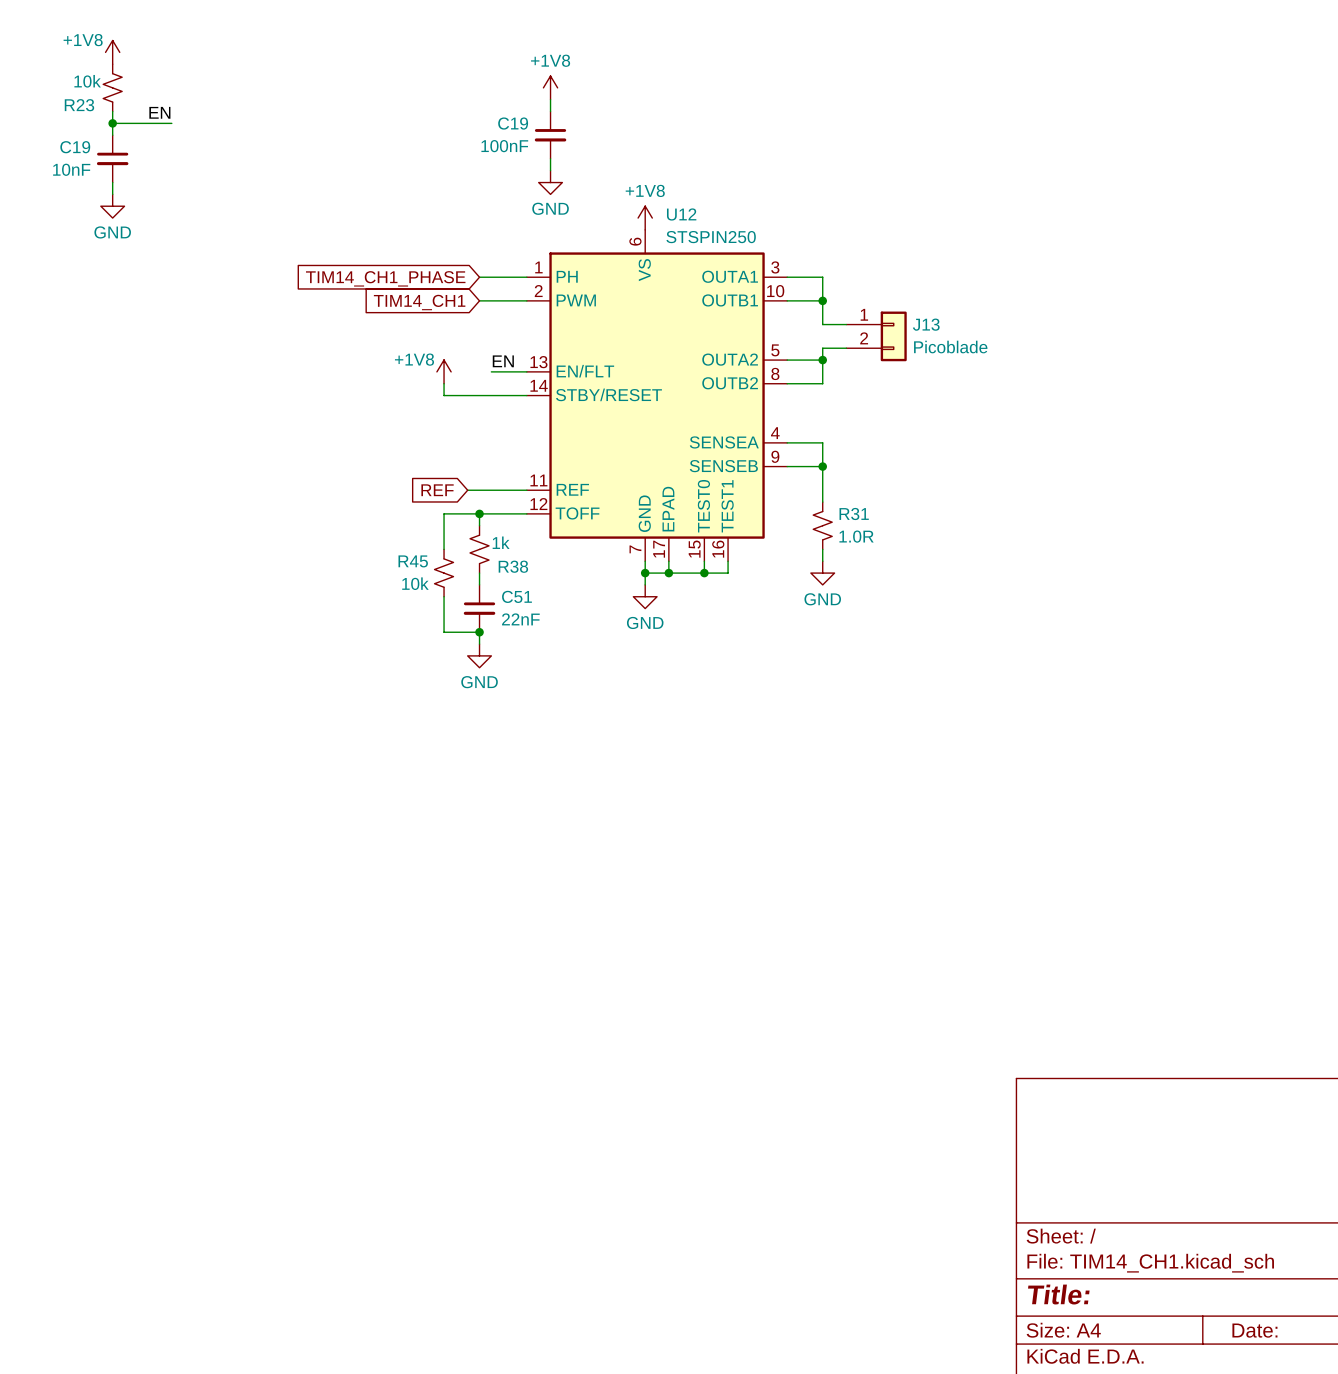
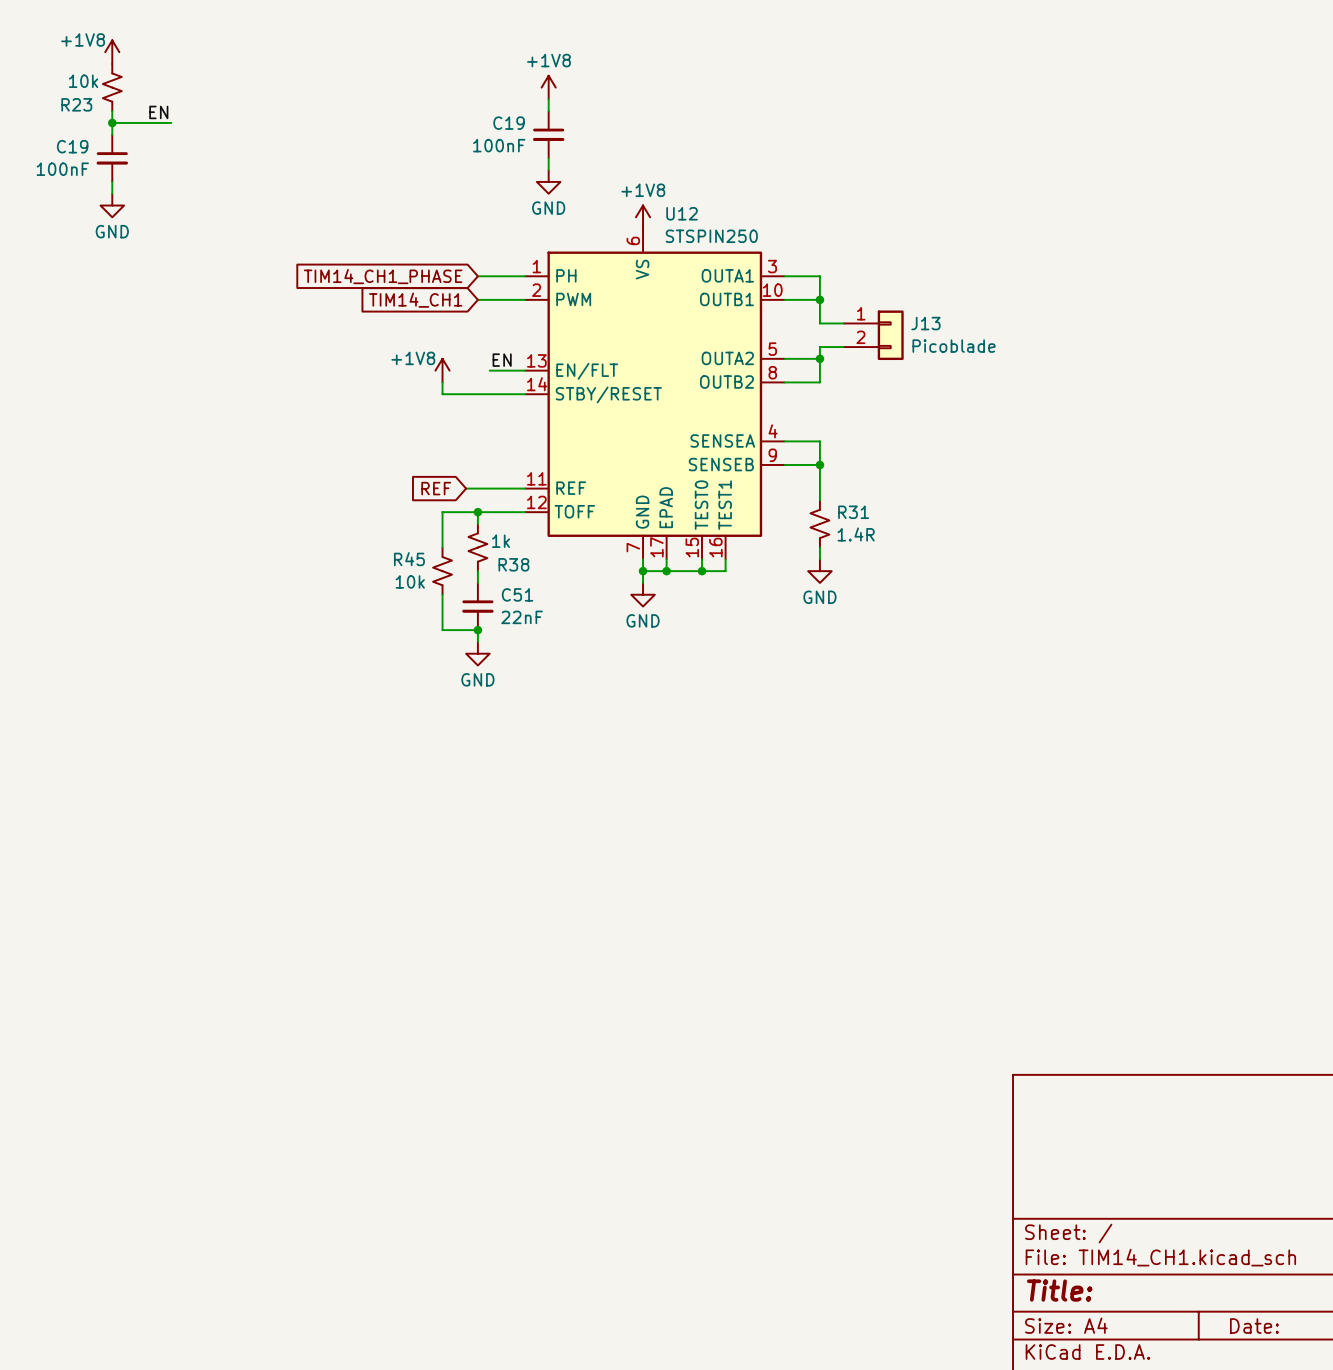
C19 value: 10nF (71, 169) -> 100nF (62, 169)
R31 value: 1.0R (856, 536) -> 1.4R (856, 534)

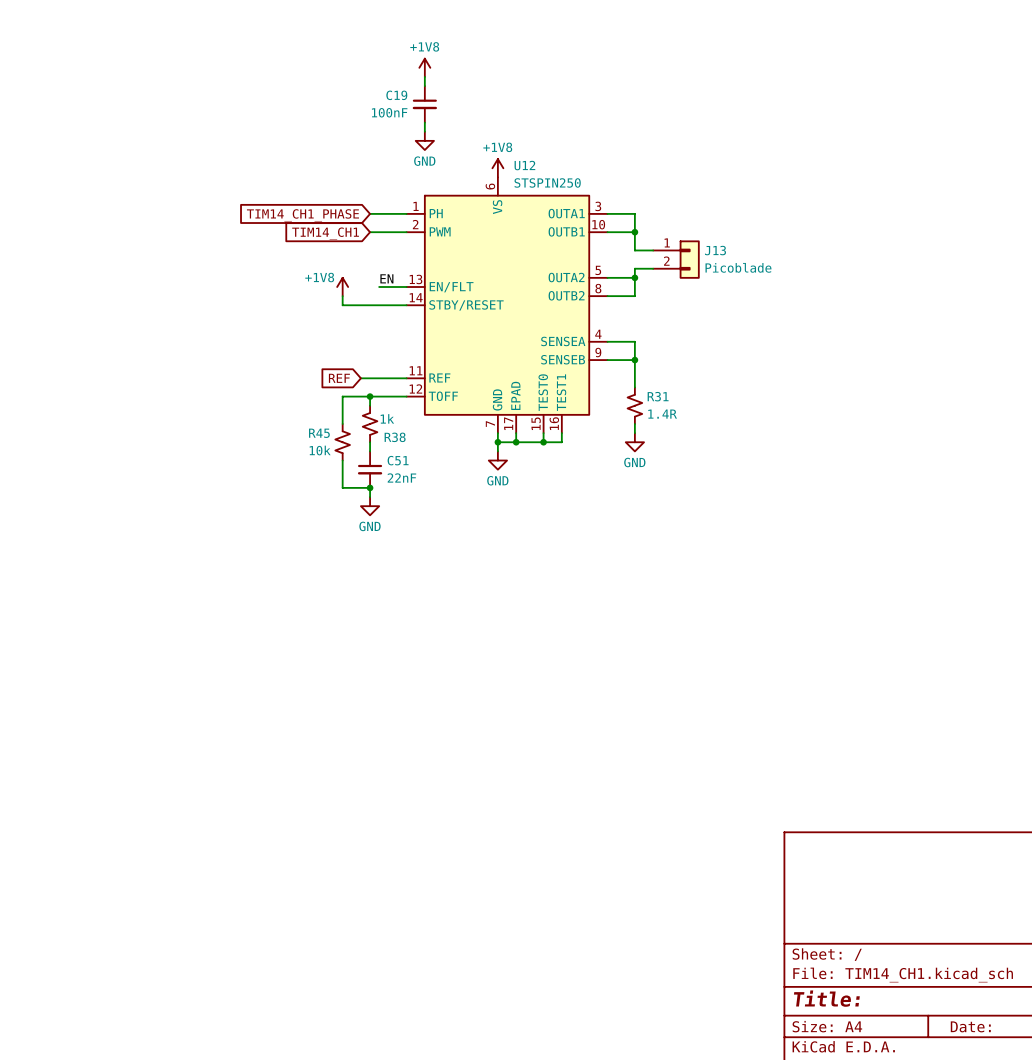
power symbol: +1V8 (112, 52) -> none
R23: 10k (112, 87) -> none
wire: (112, 111) (112, 134) -> none
label: EN (158, 112) -> none
wire: (112, 122) (171, 122) -> none
junction: (112, 122) -> none
C19: 100nF (112, 158) -> none
wire: (112, 181) (112, 193) -> none
power symbol: GND (112, 205) -> none

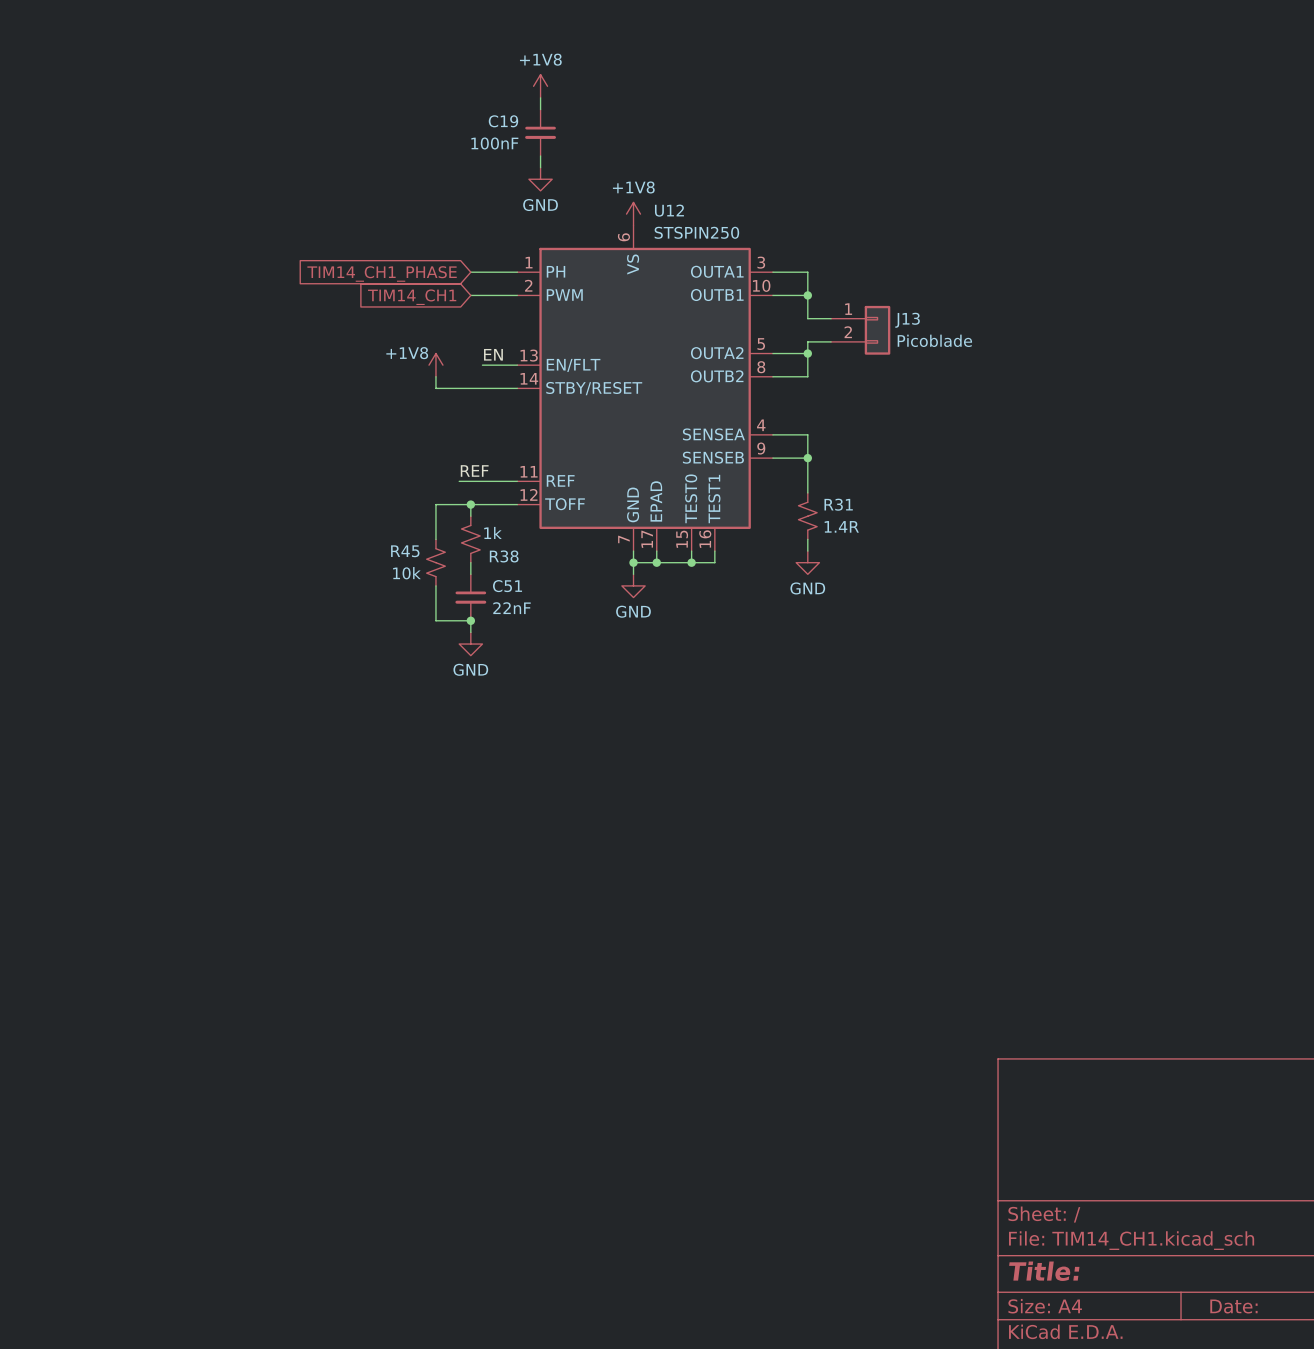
label: none -> REF (474, 470)
global label: REF (339, 378) -> none

